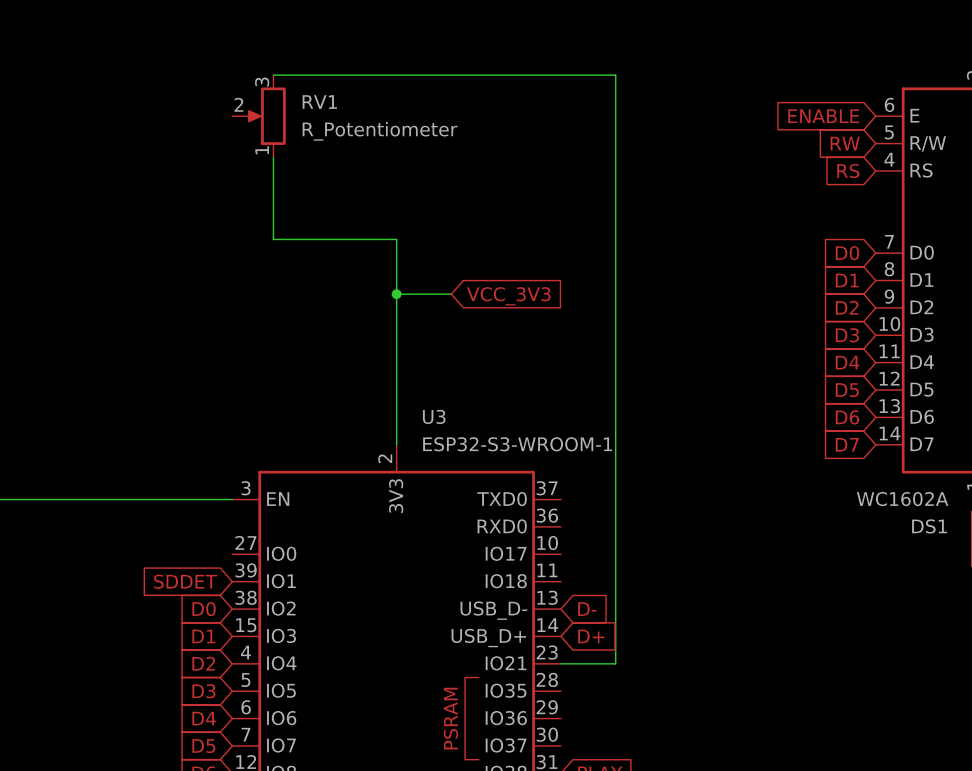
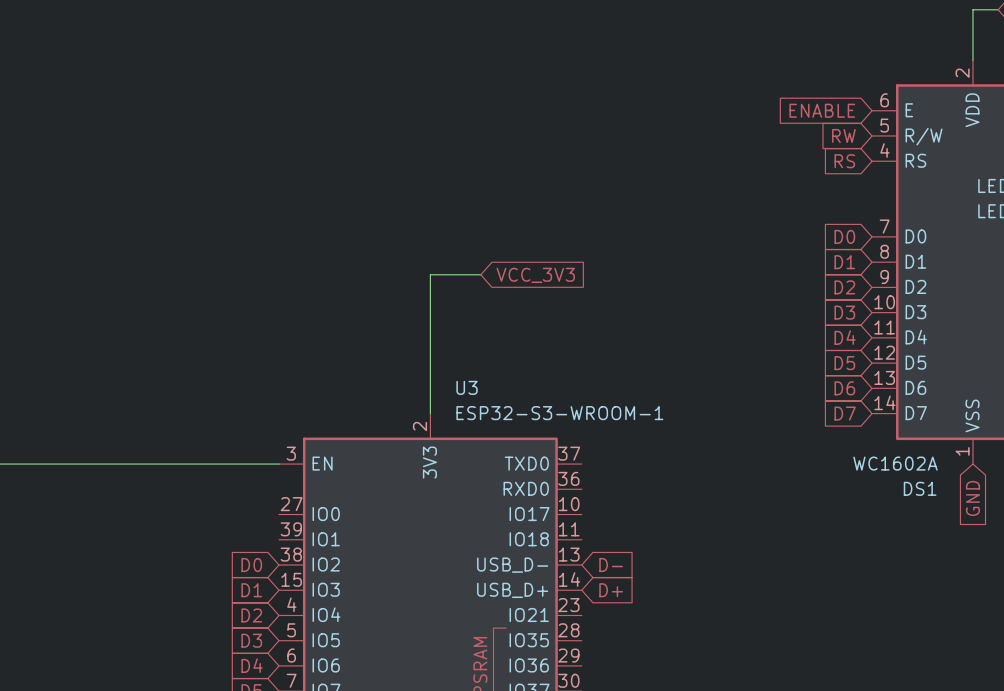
wire: (273, 75) (615, 75) (615, 663) (560, 663) -> none
RV1: R_Potentiometer (259, 116) -> none
wire: (273, 157) (273, 239) (396, 239) (396, 294) -> none
junction: (396, 294) -> none
global label: SDDET (185, 581) -> none

